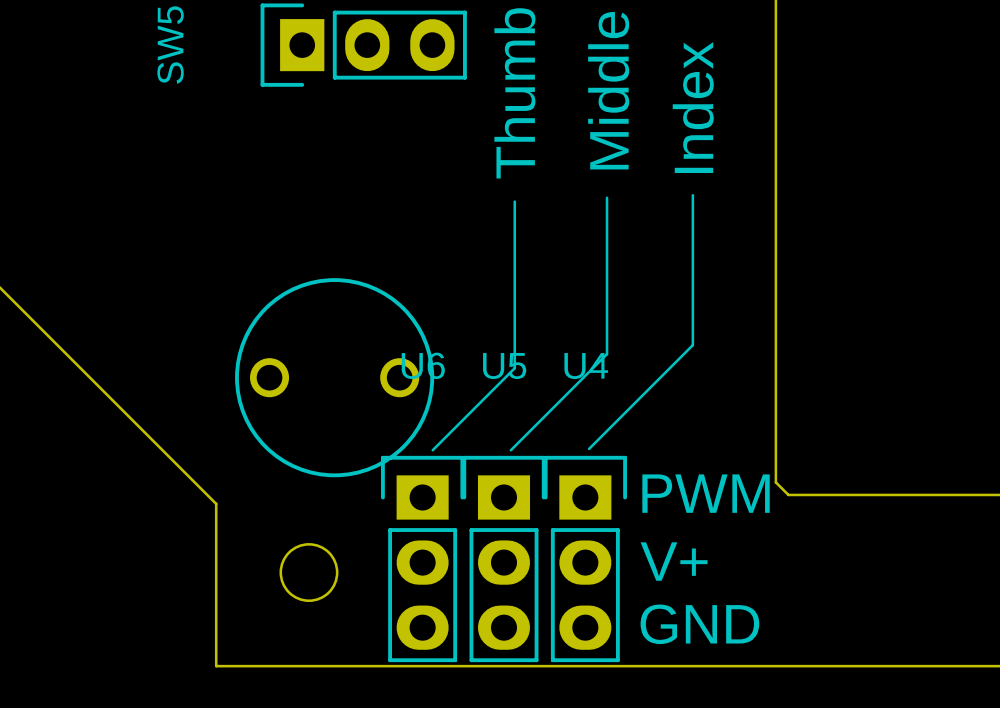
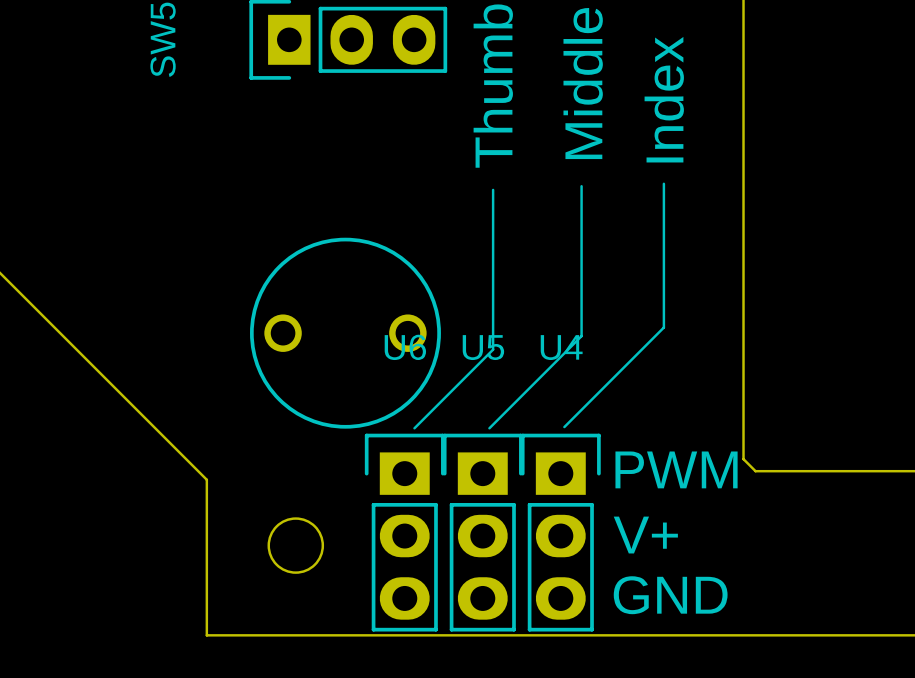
part position: (334, 377) -> (345, 333)

